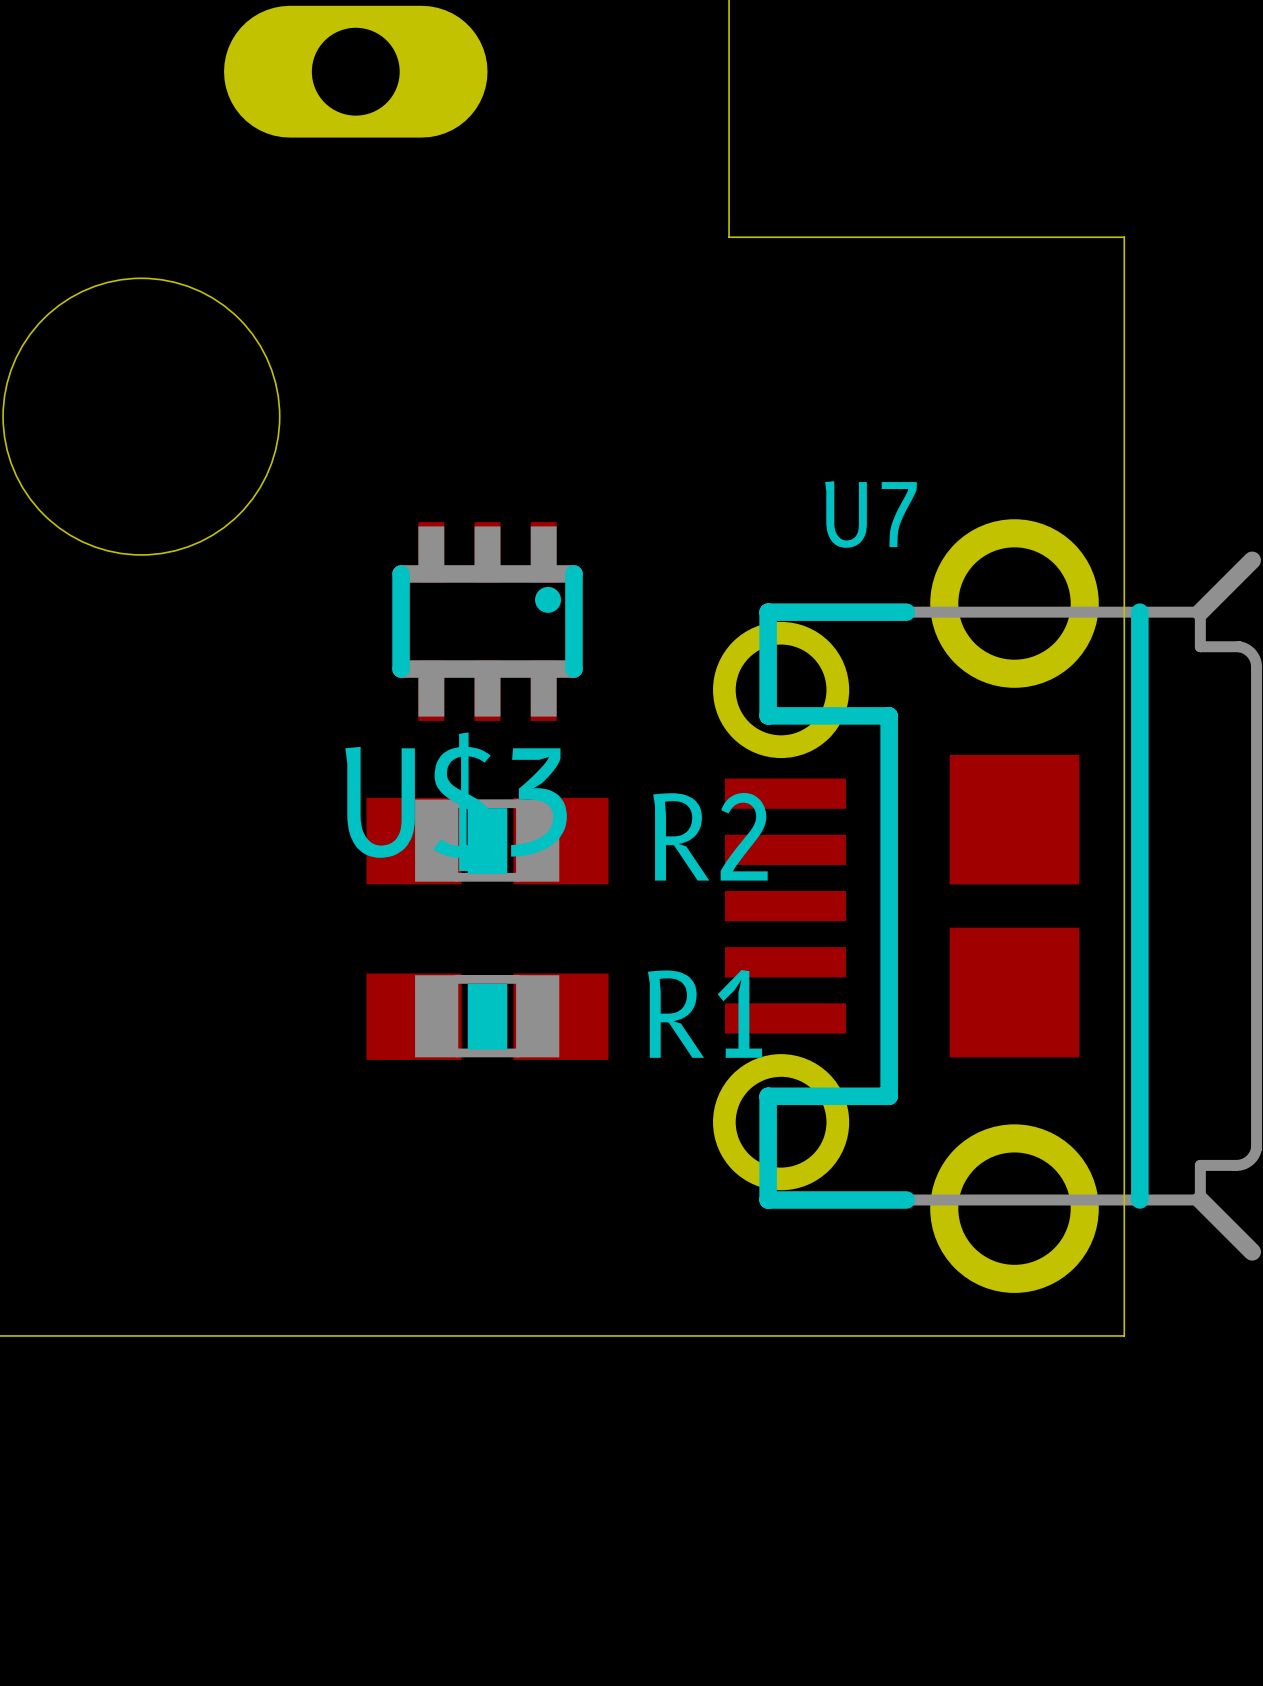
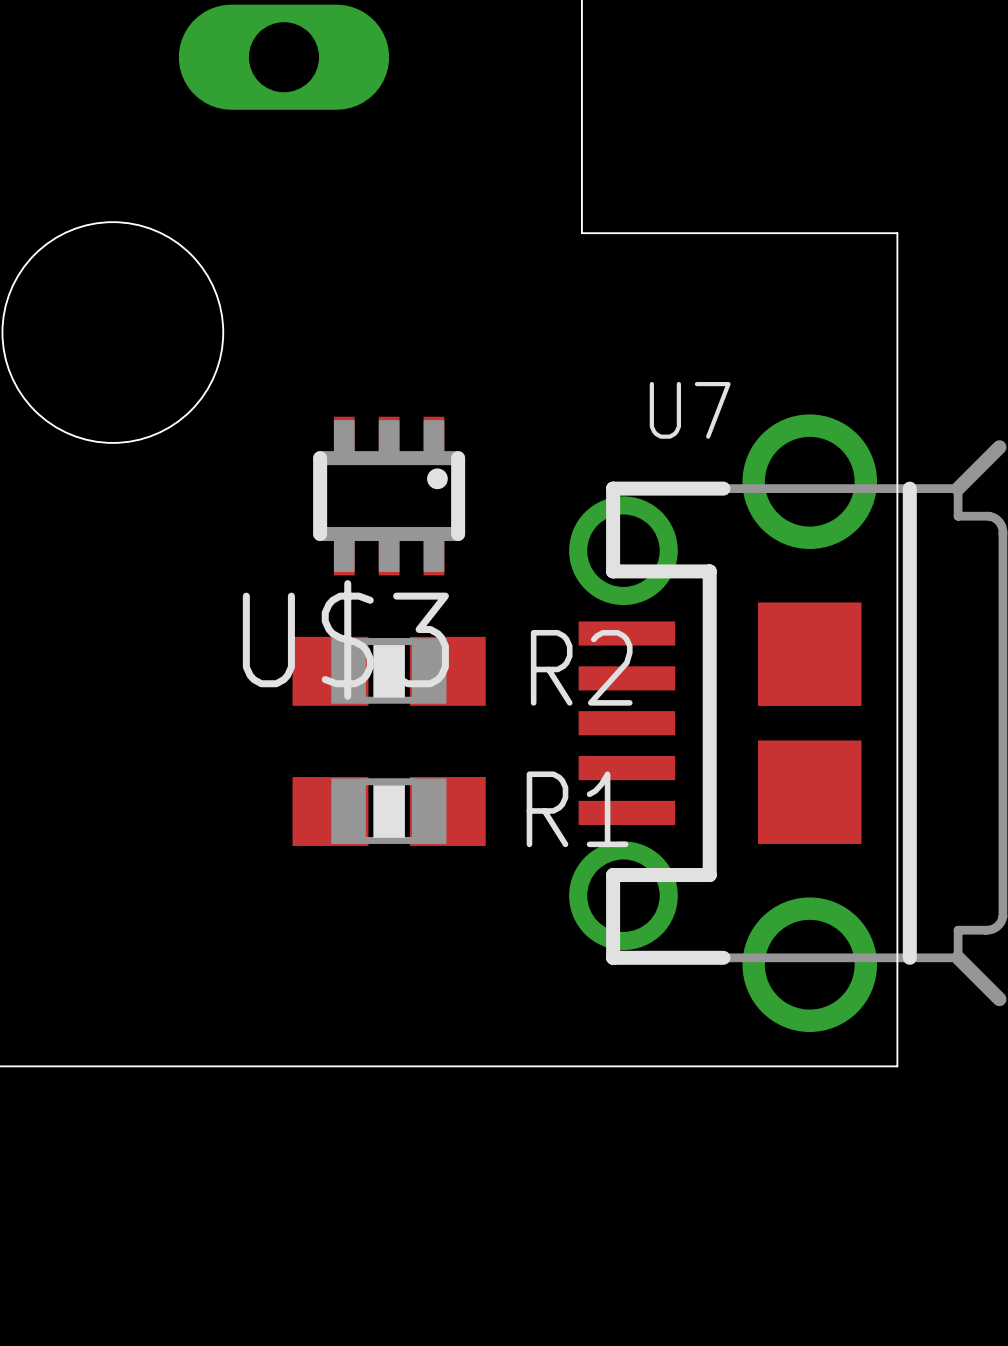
board edge: (729, 237) (1124, 237) (1124, 292) -> (581, 189) (581, 233) (897, 233)

